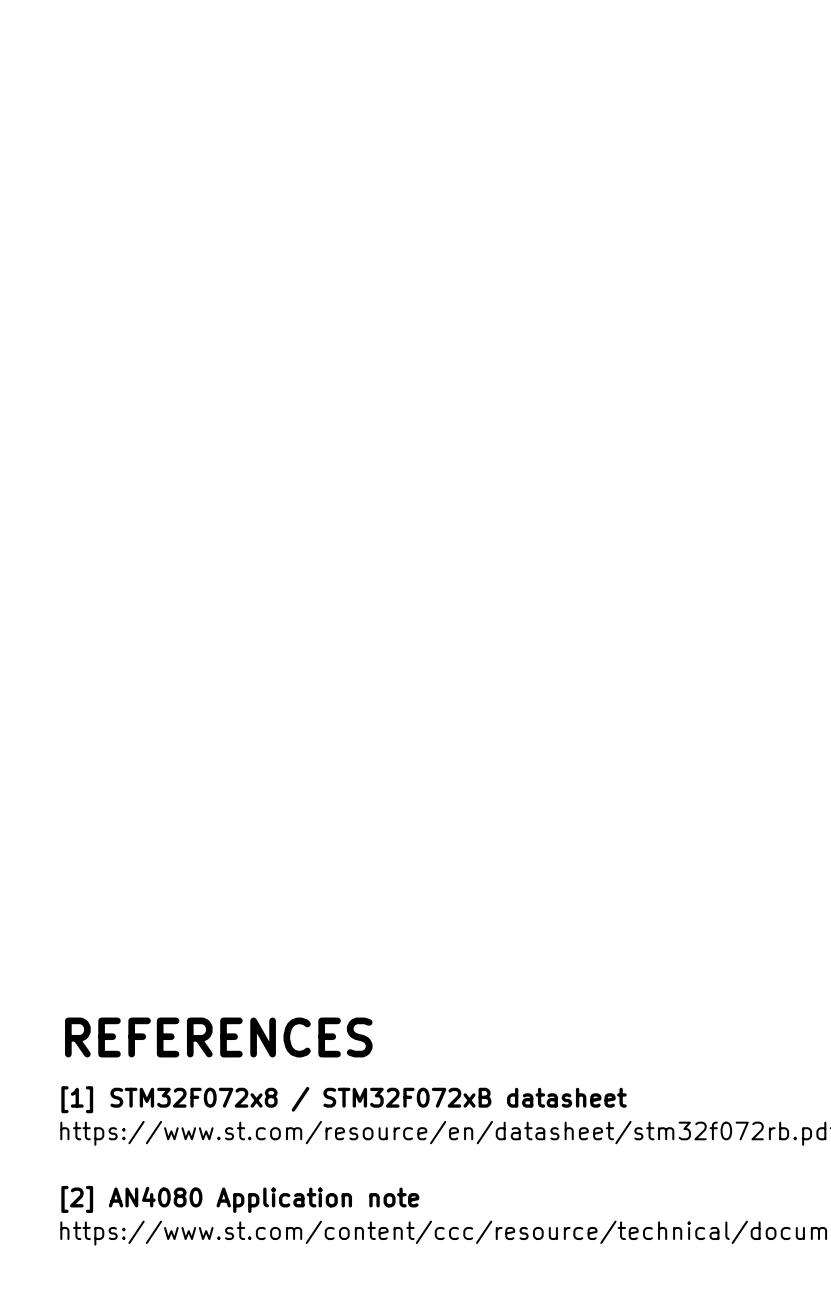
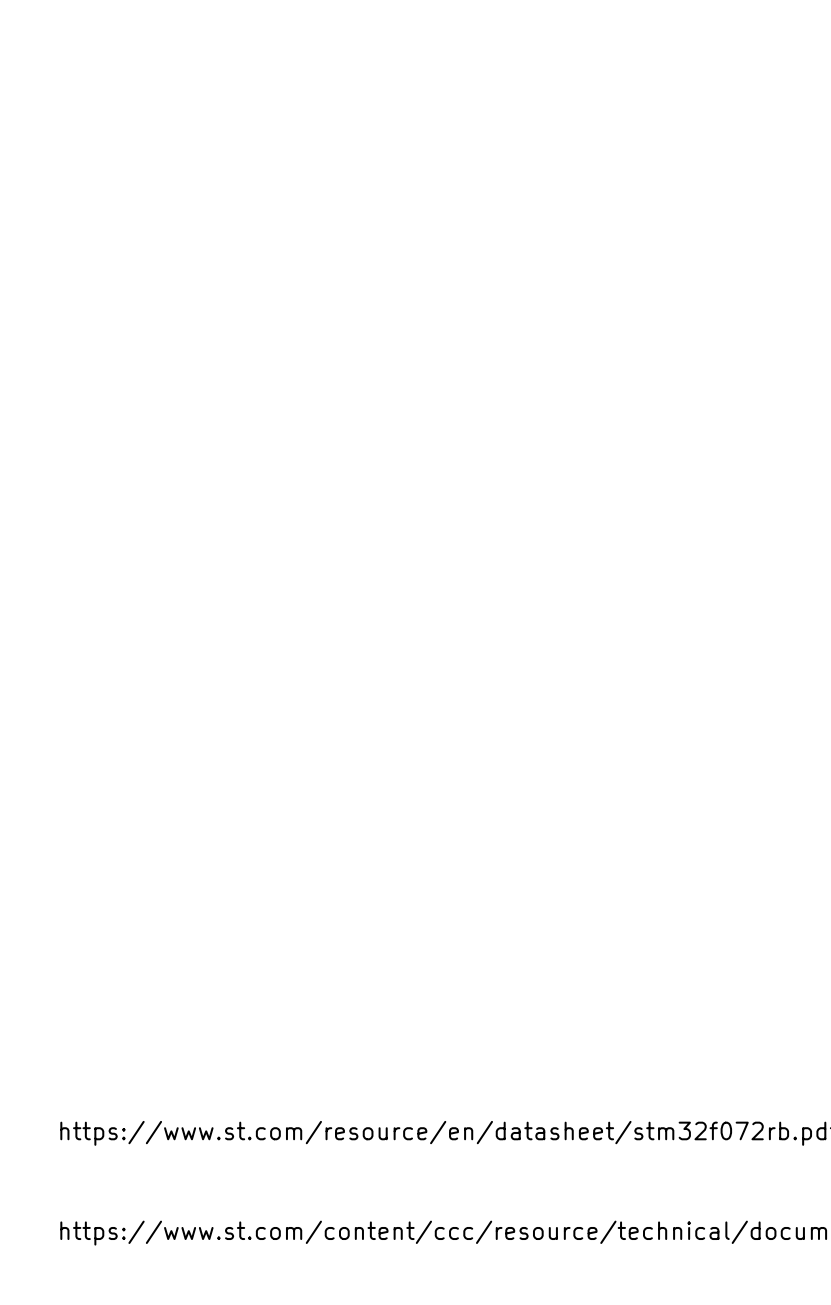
text: REFERENCES (218, 1037) -> none
text: [1] STM32F072x8 / STM32F072xB datasheet (344, 1099) -> none
text: [2] AN4080 Application note (240, 1199) -> none

